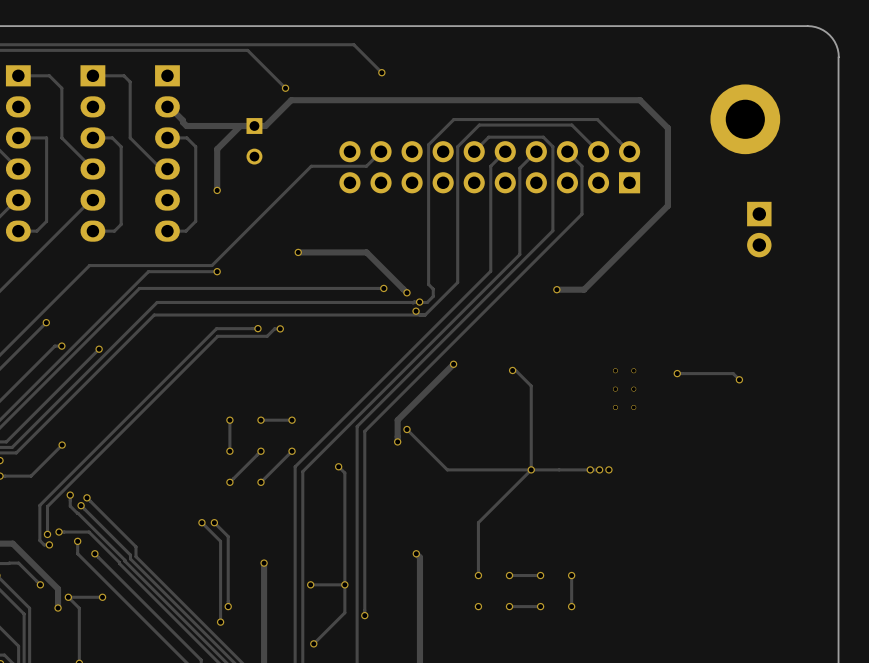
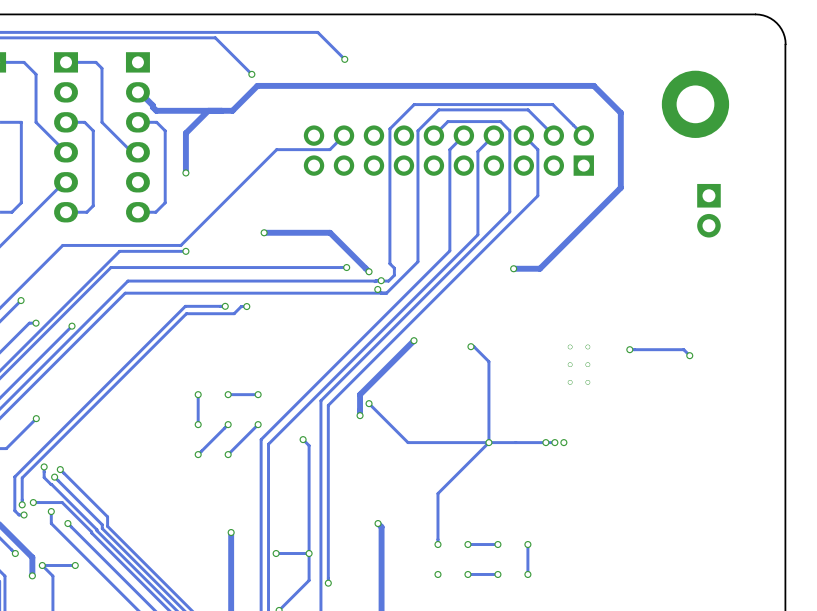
part: (254, 141) -> none
track: (201, 522) (220, 541) (220, 622) -> none
via: (201, 522) -> none
track: (214, 522) (228, 536) (228, 606) -> none
via: (214, 522) -> none
via: (228, 606) -> none
via: (220, 622) -> none

